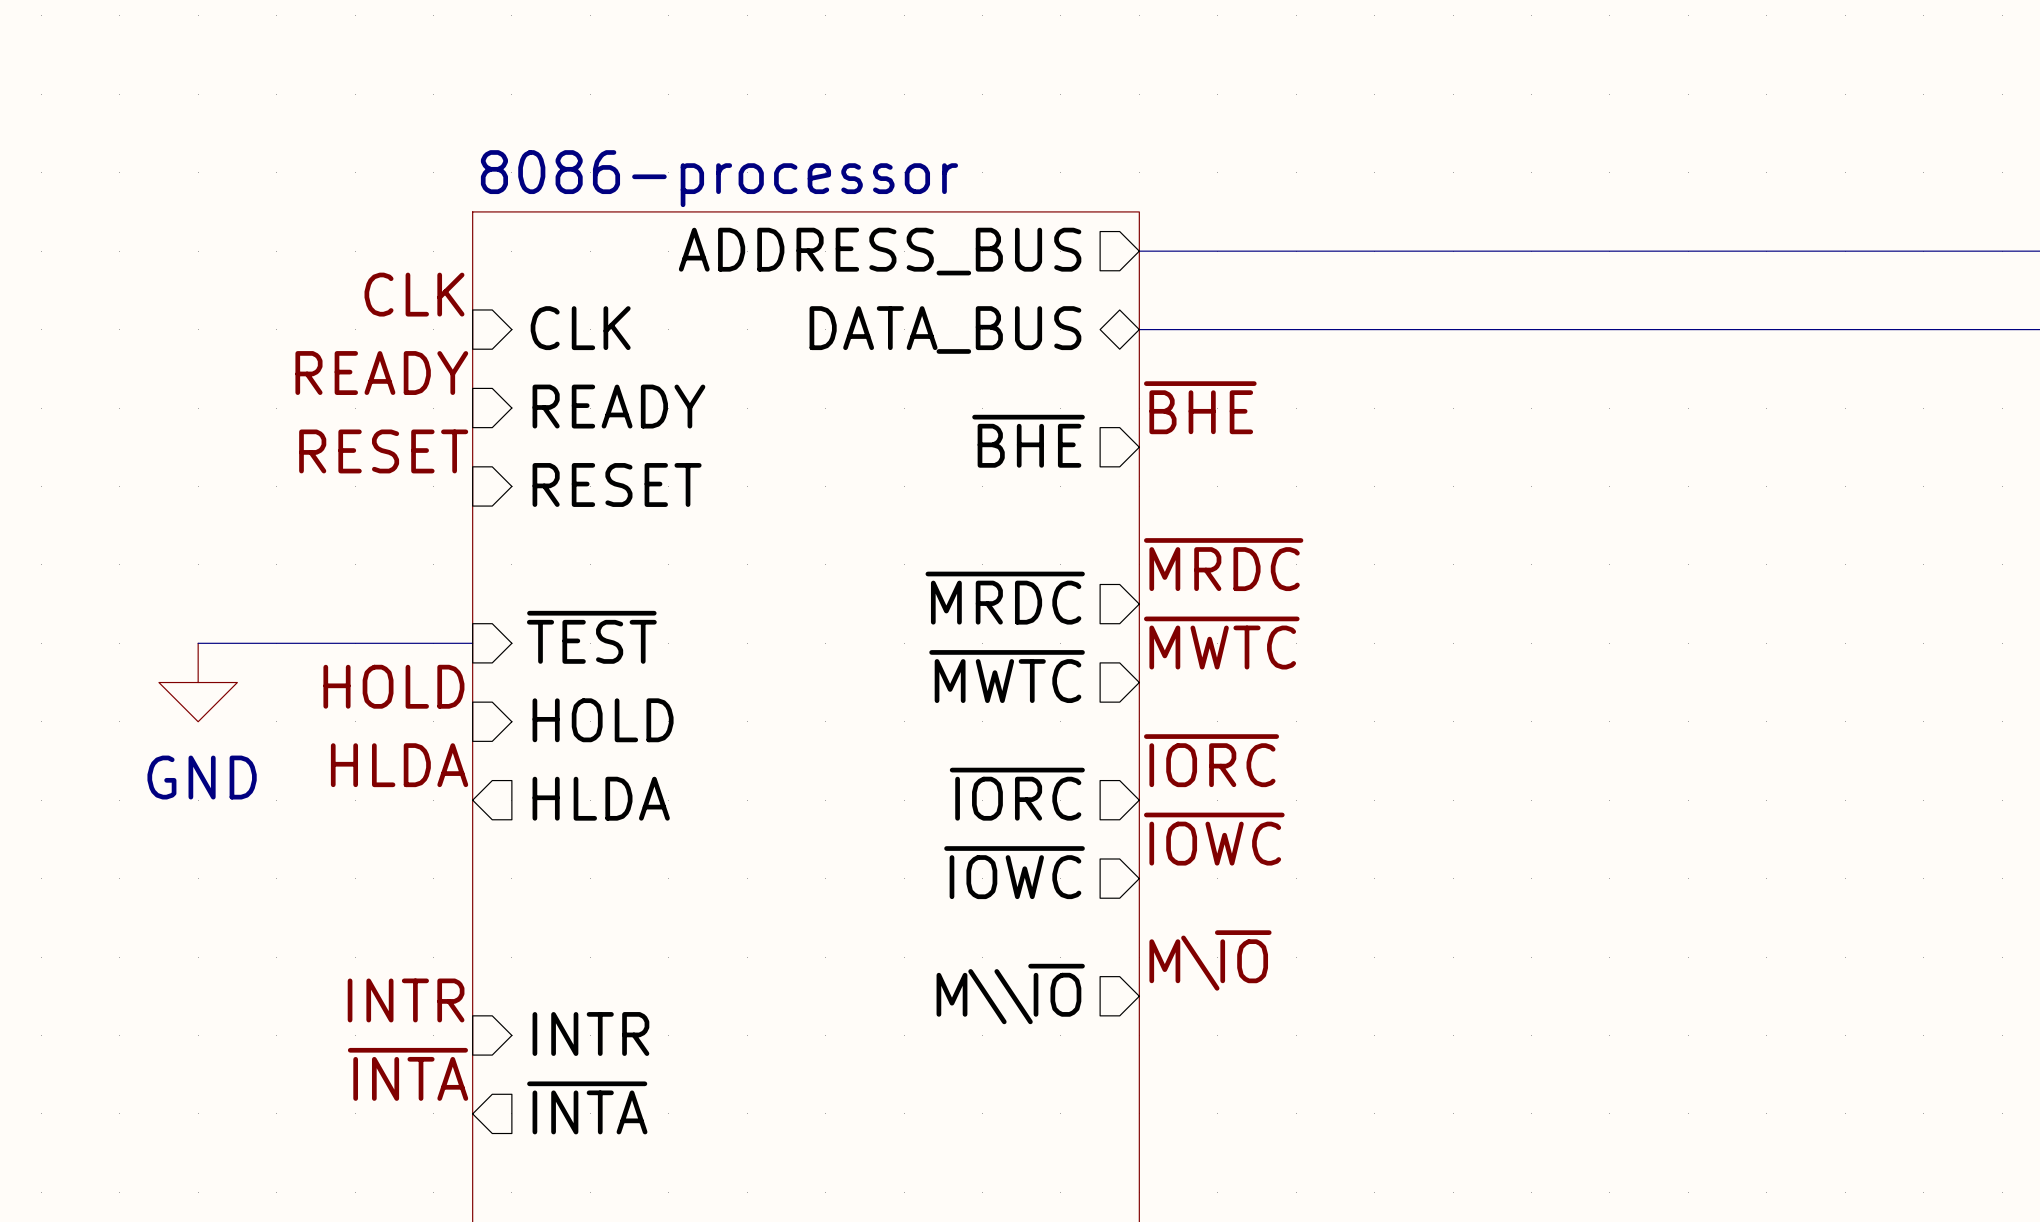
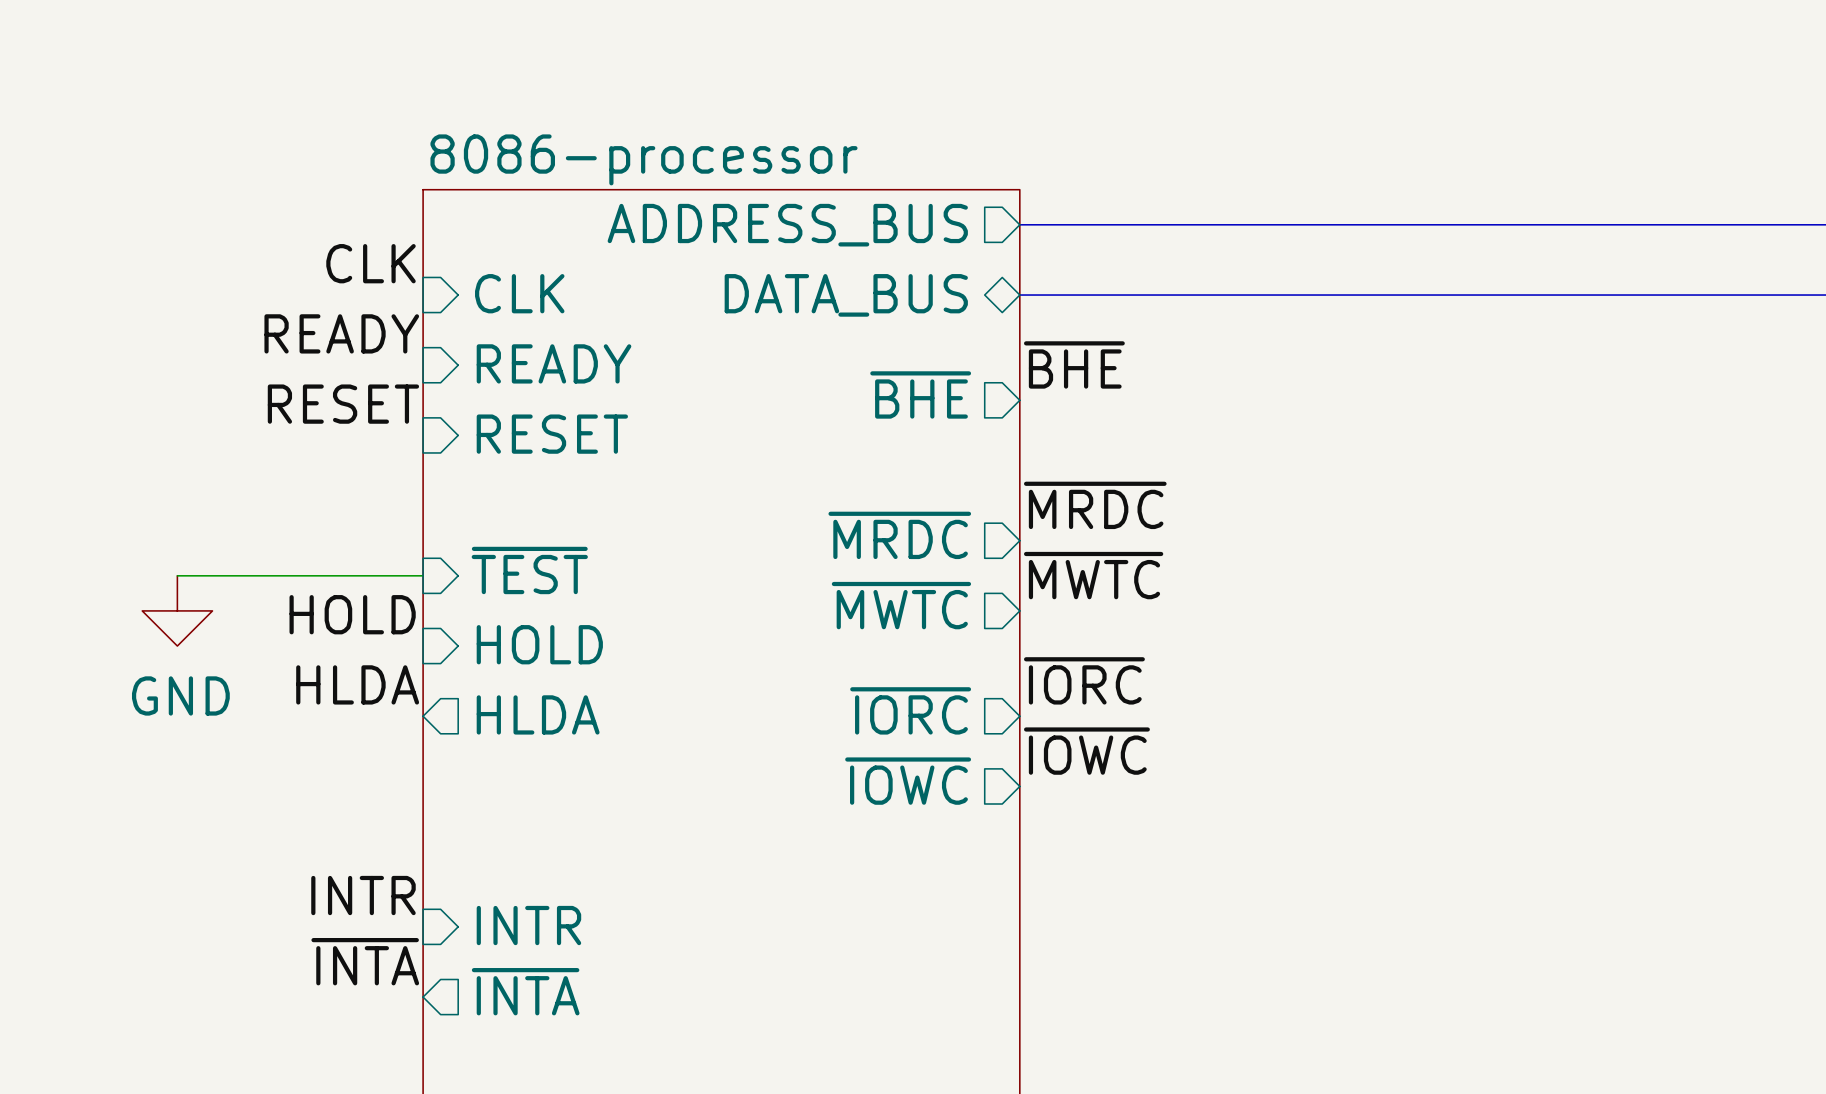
label: M\~{IO} (1210, 960) -> none
sheet pin: M\\~{IO} (1010, 994) -> none

